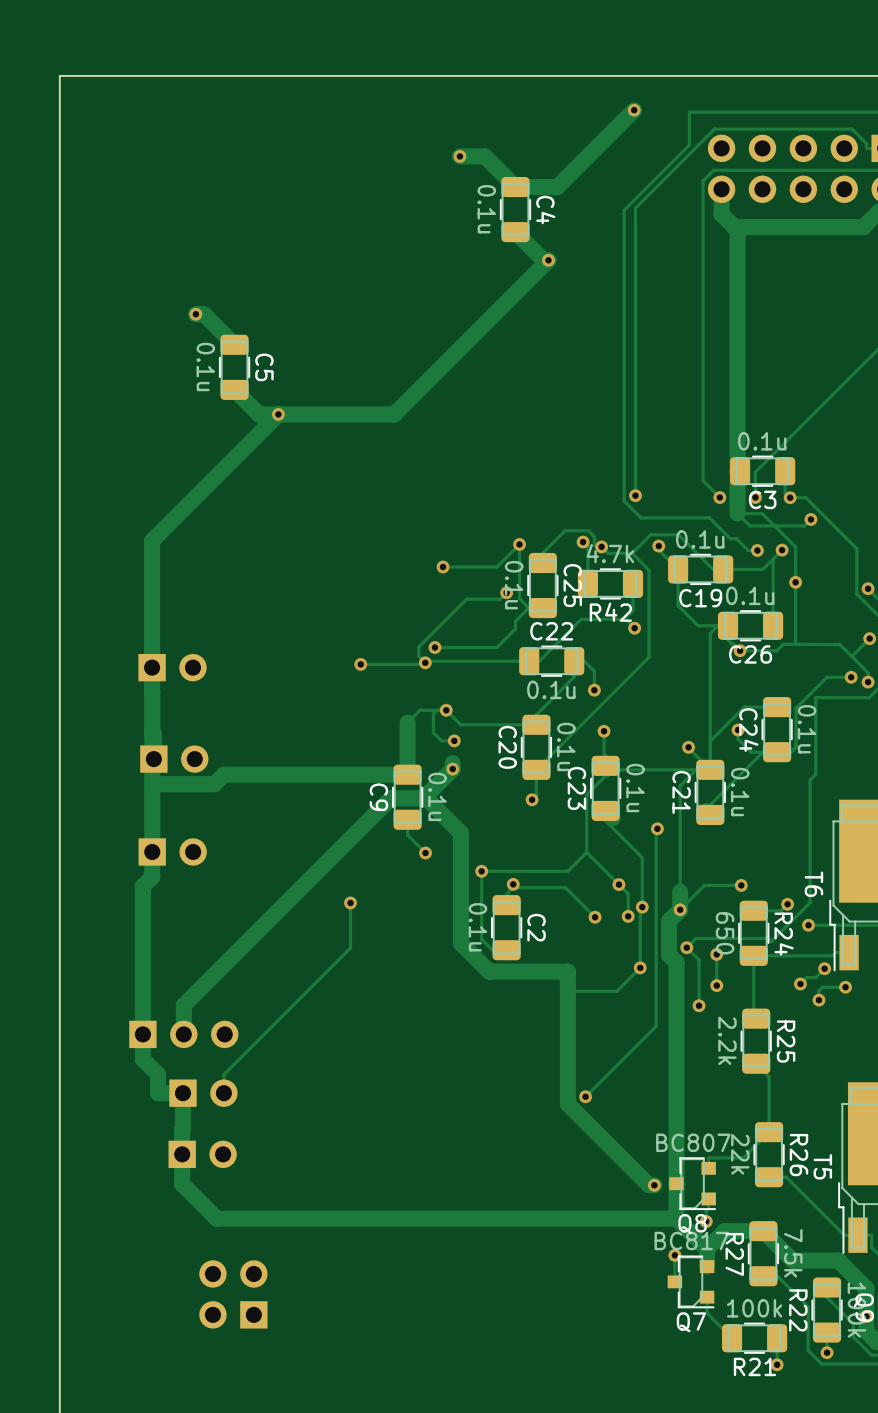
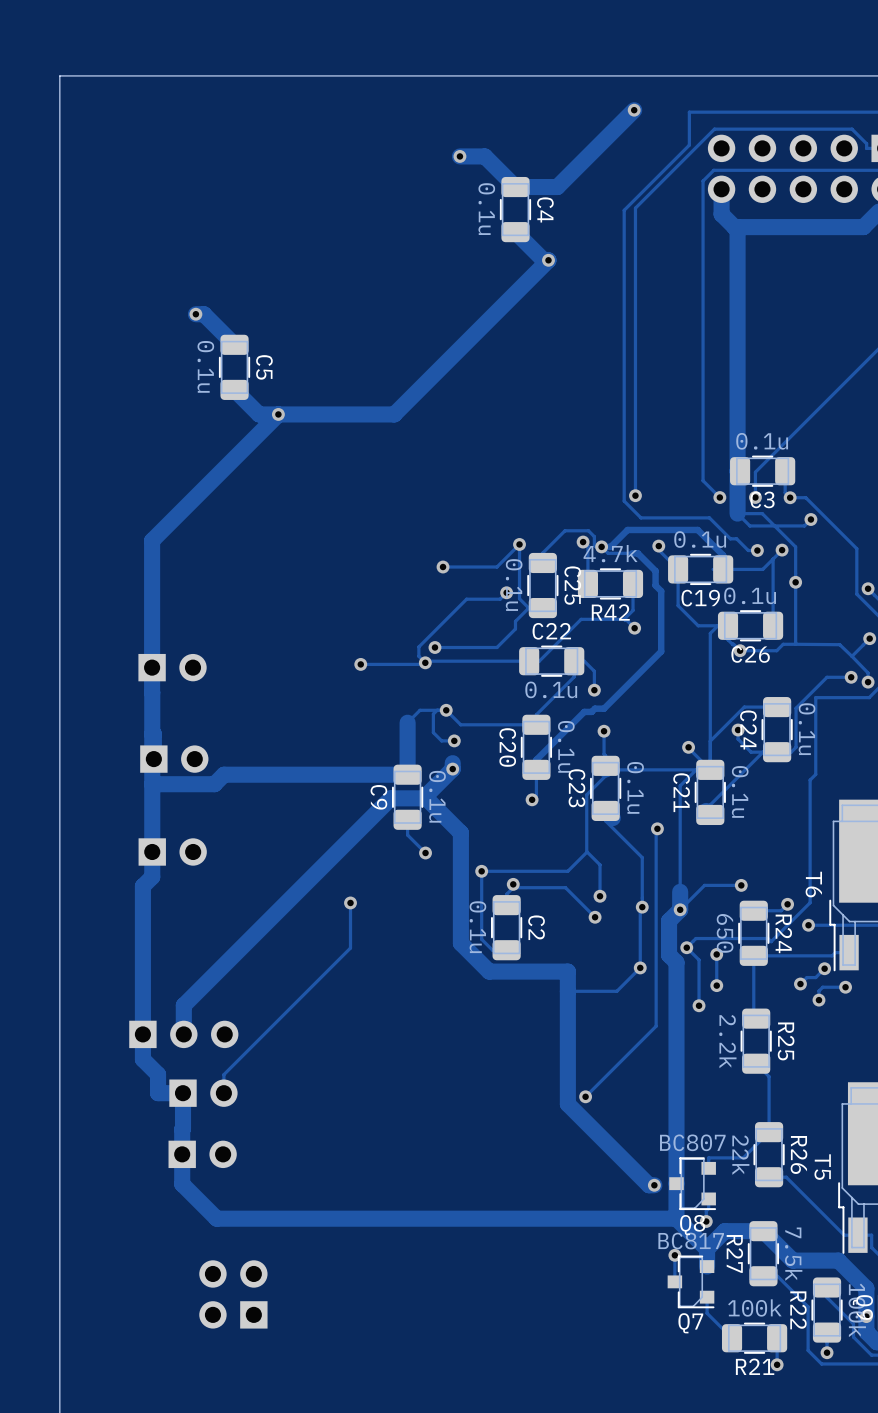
track: none -> (601, 546) (610, 546) (627, 529) (697, 529) (723, 555) (723, 569)
track: (713, 569) (678, 534) (650, 534) (632, 553) (649, 570) (649, 657) (536, 769) -> (632, 553) (637, 553) (655, 571) (655, 585) (661, 591) (661, 651) (604, 708) (584, 711) (536, 759) (536, 769)
track: (567, 871) (586, 852) (628, 893) (628, 916) -> (567, 871) (587, 851) (600, 864) (600, 896)
via: (618, 884) -> none
via: none -> (600, 896)
via: (628, 916) -> none

